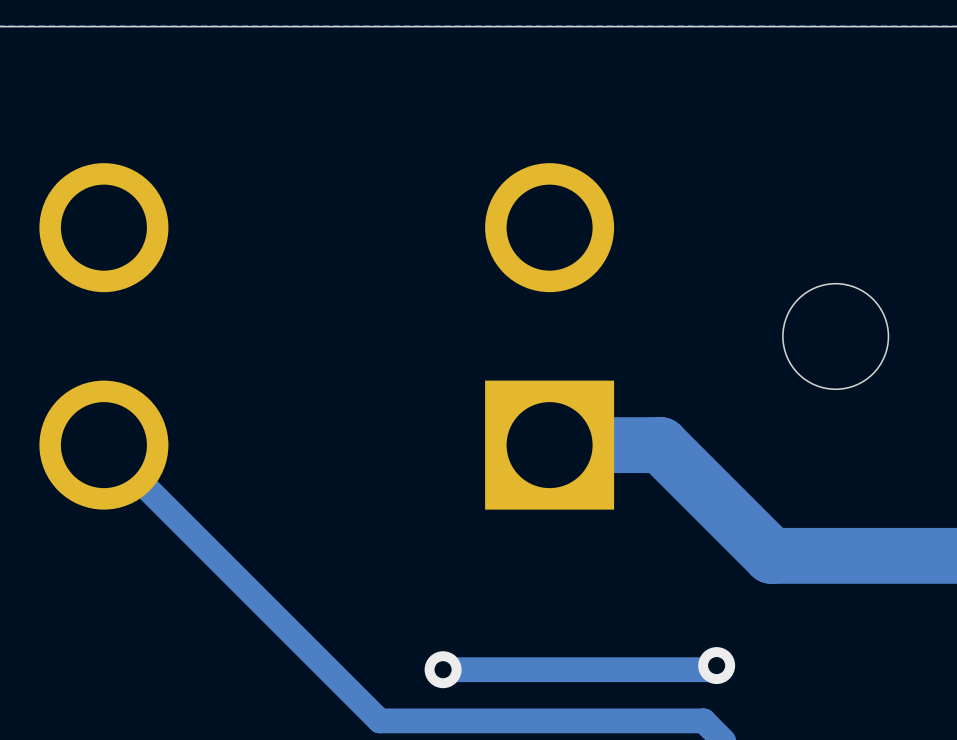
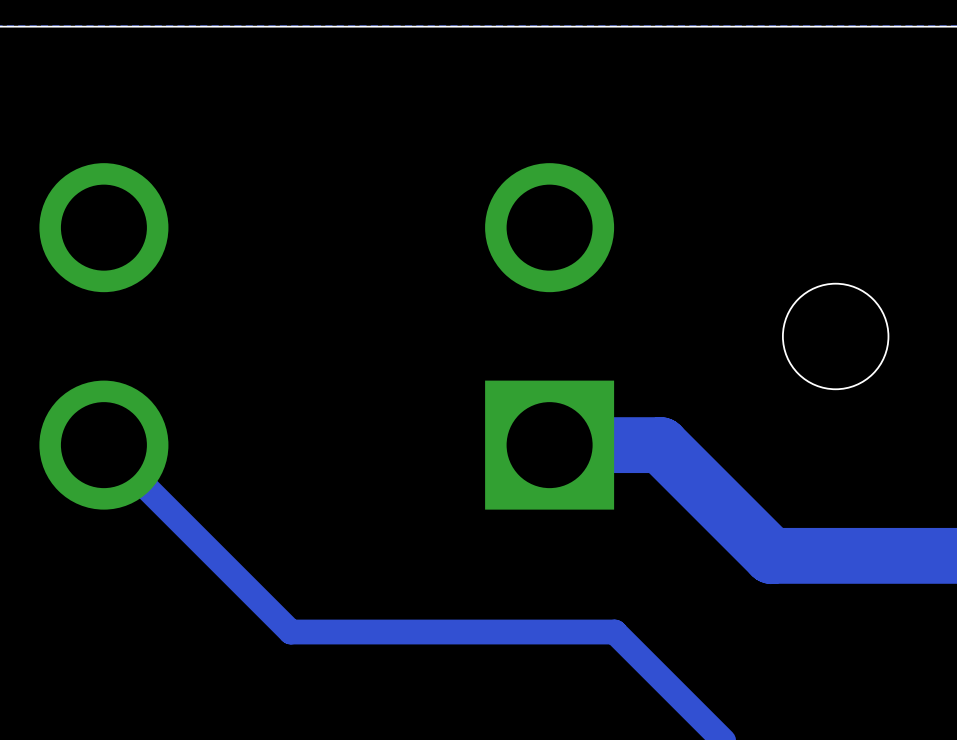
track: (290, 632) (379, 720) (703, 720) -> (290, 632) (614, 632) (703, 720)
track: (716, 665) (712, 669) (443, 669) -> none
via: (716, 665) -> none
via: (443, 669) -> none

